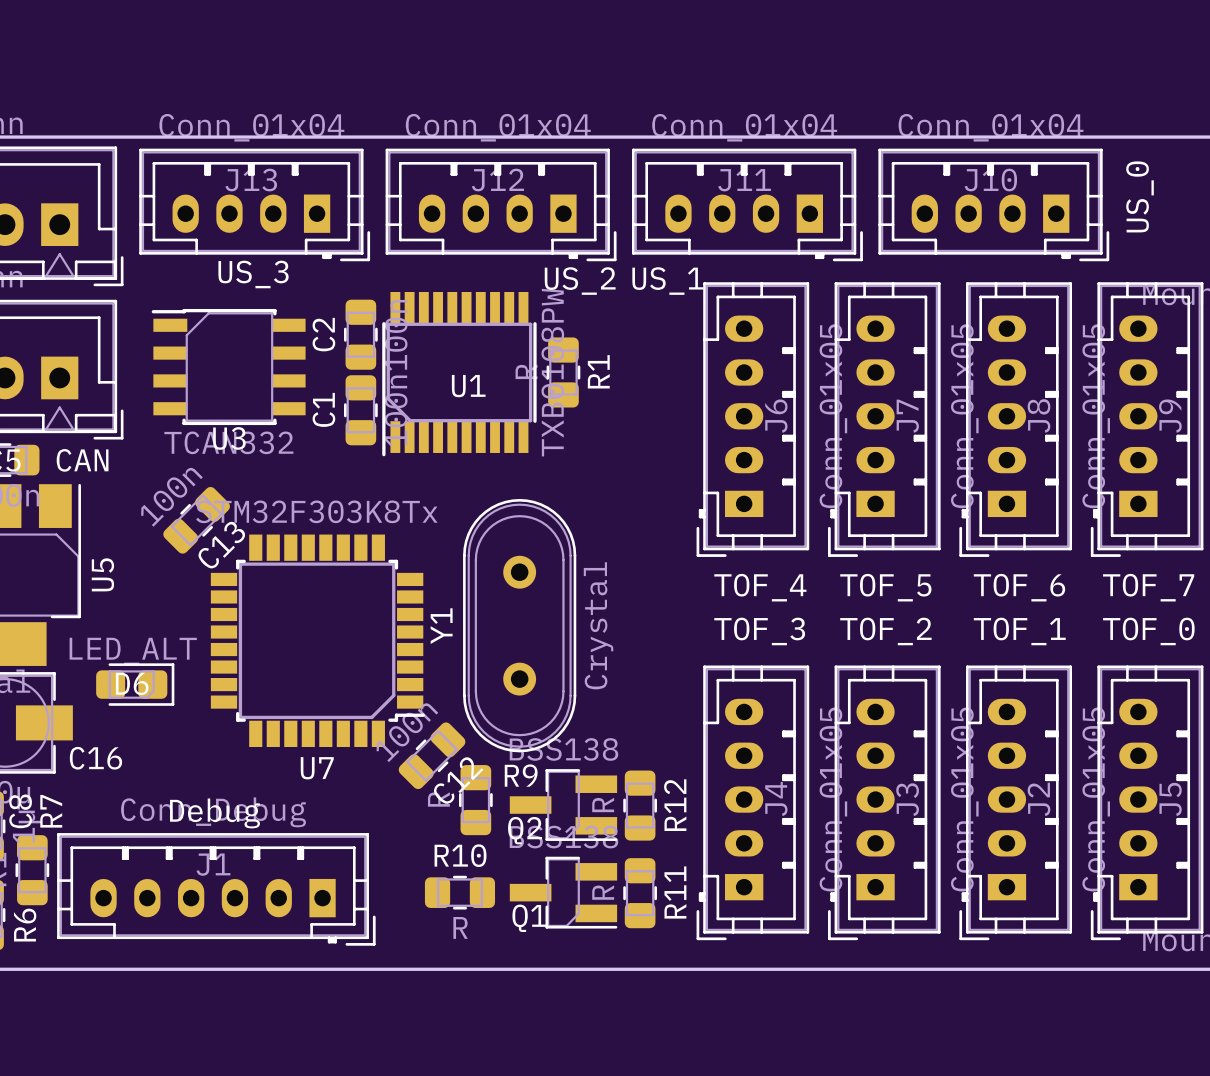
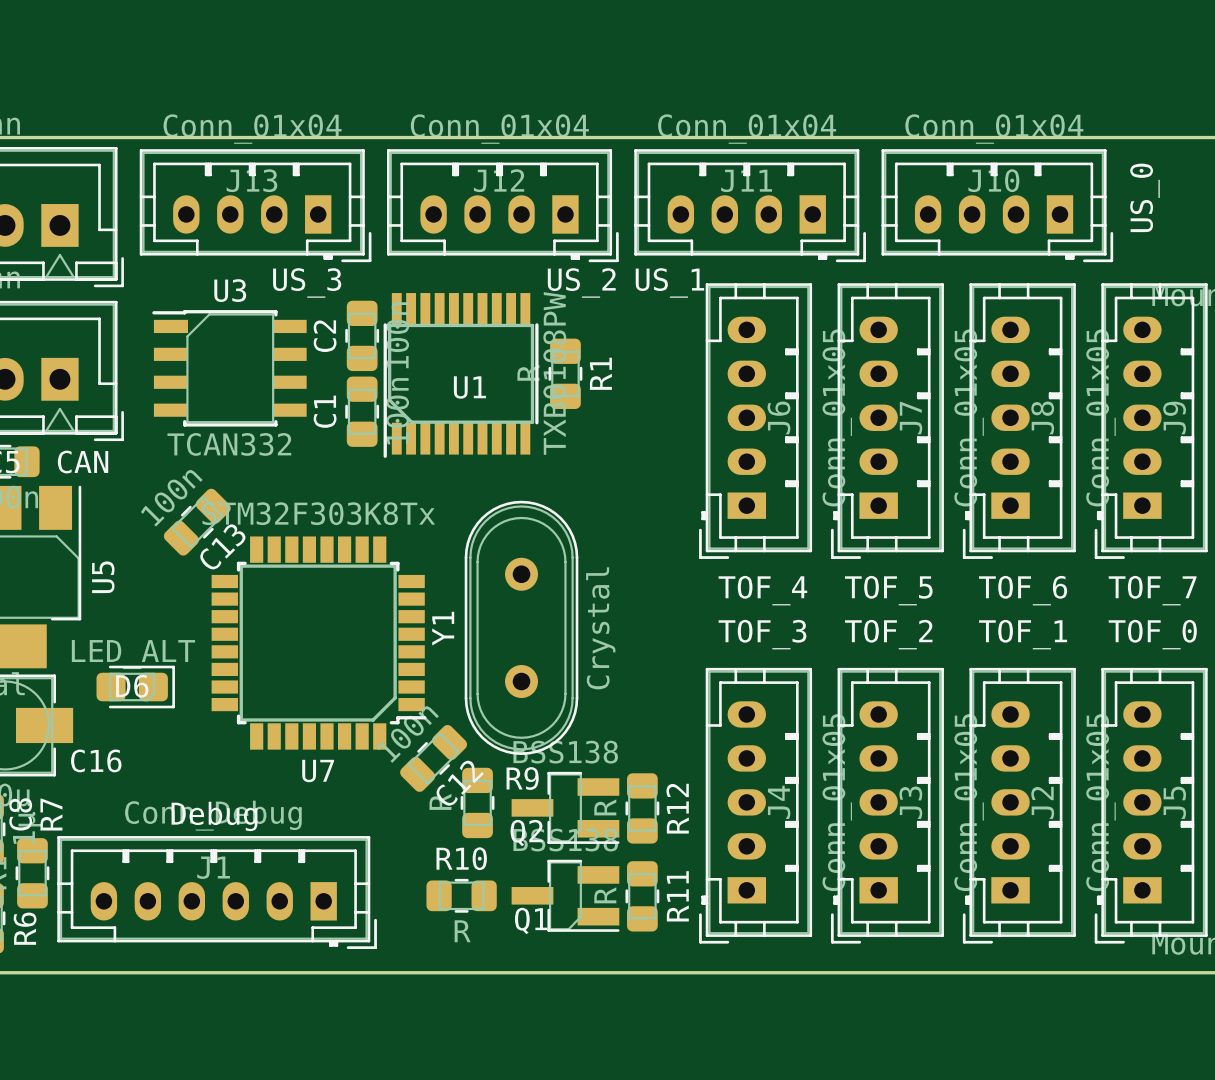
text position: US_3 (253, 274) -> US_3 (307, 282)
U3 name position: U3 (229, 438) -> U3 (230, 290)

